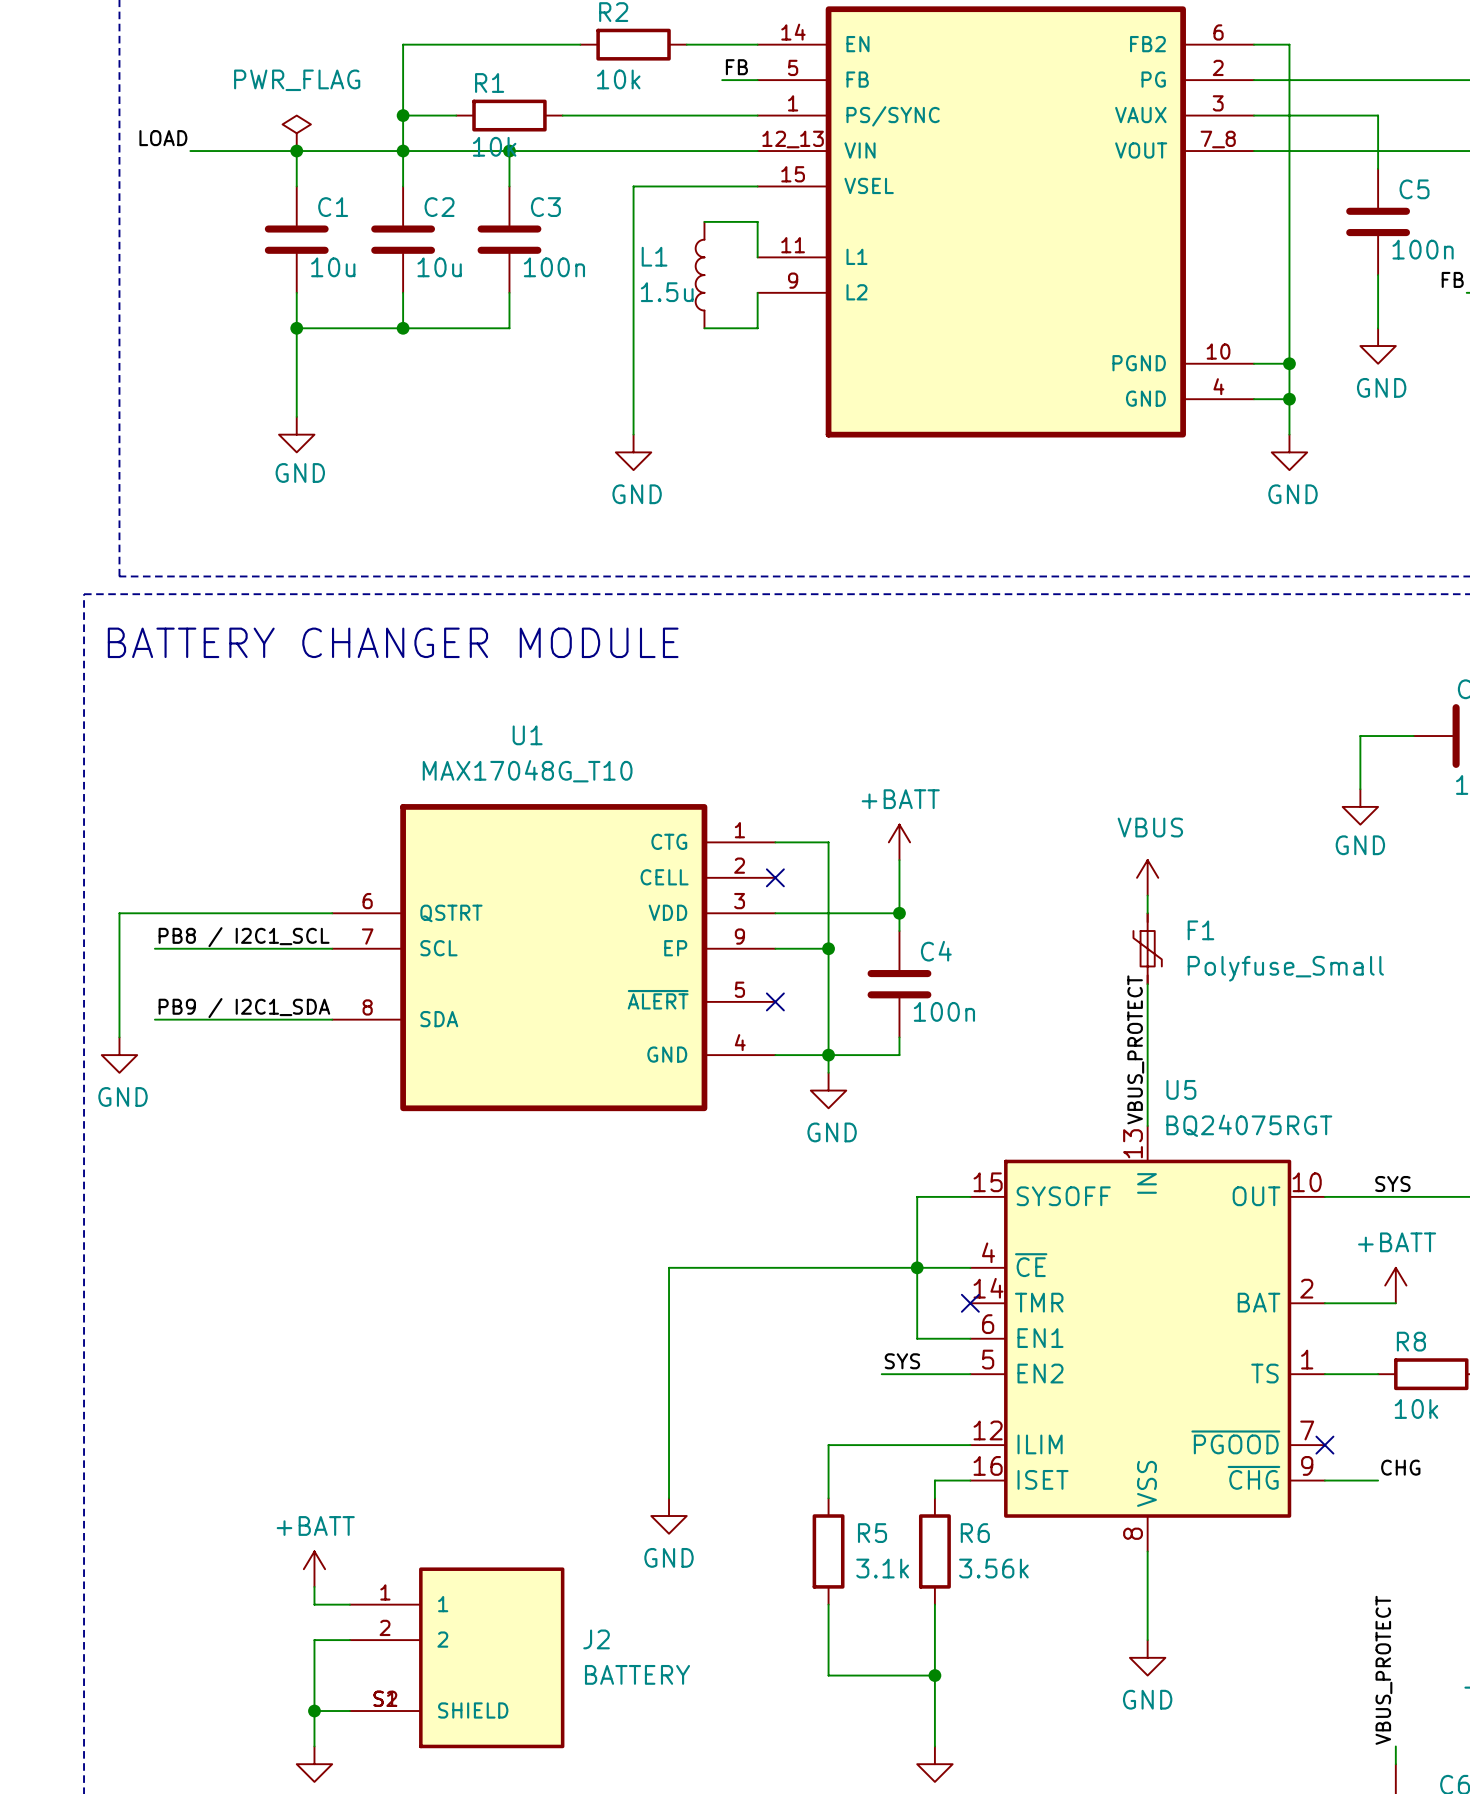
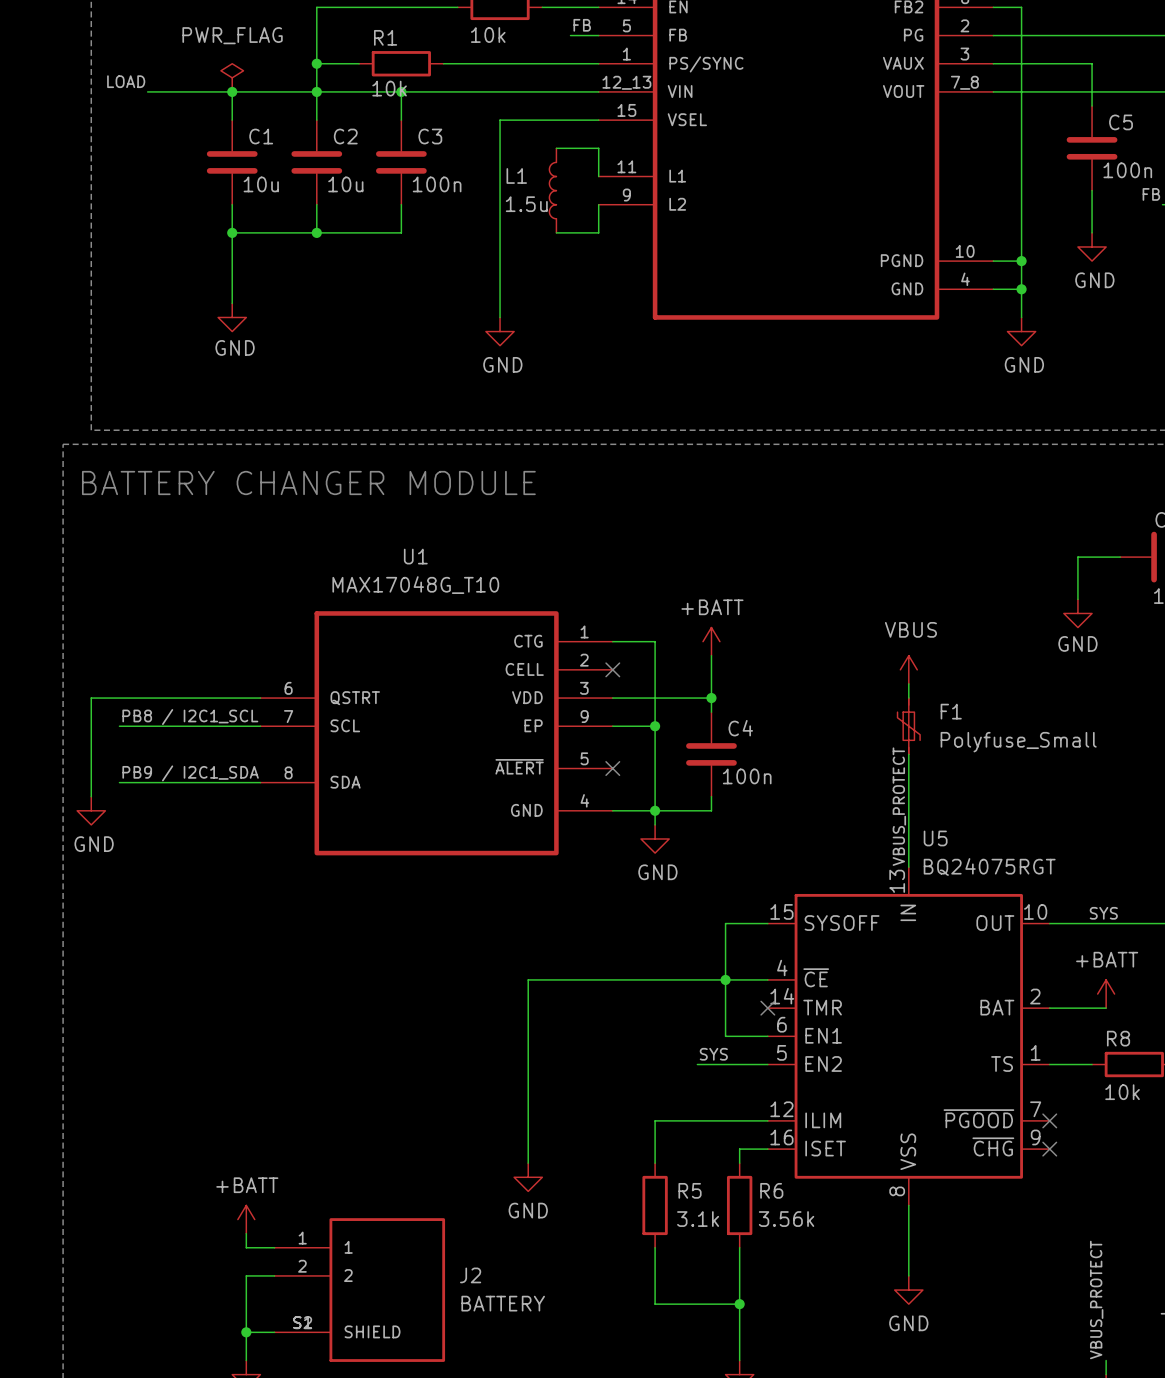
label: CHG (1400, 1467) -> none
wire: (1324, 1480) (1378, 1480) -> none
no-connect mark: none -> (1049, 1149)

